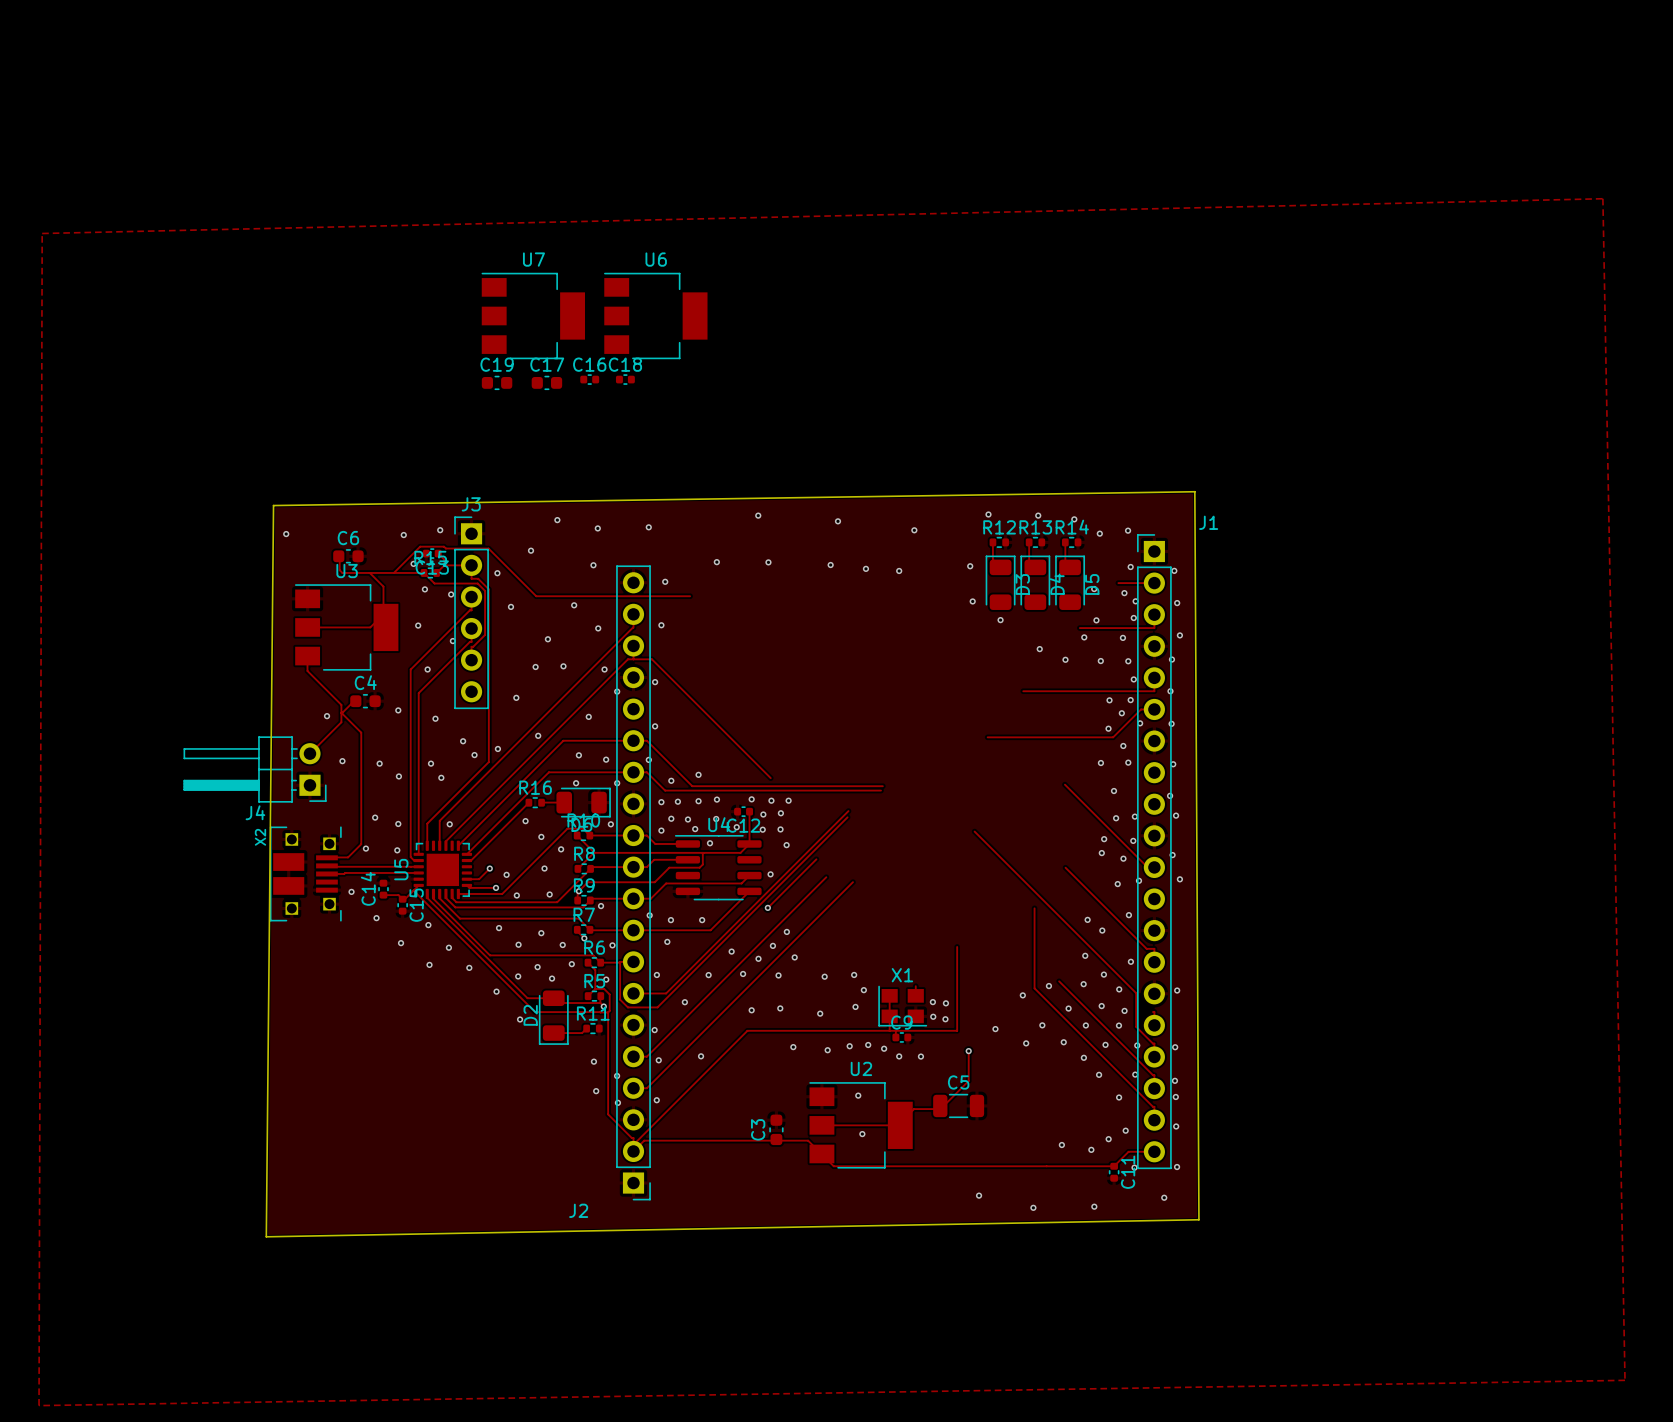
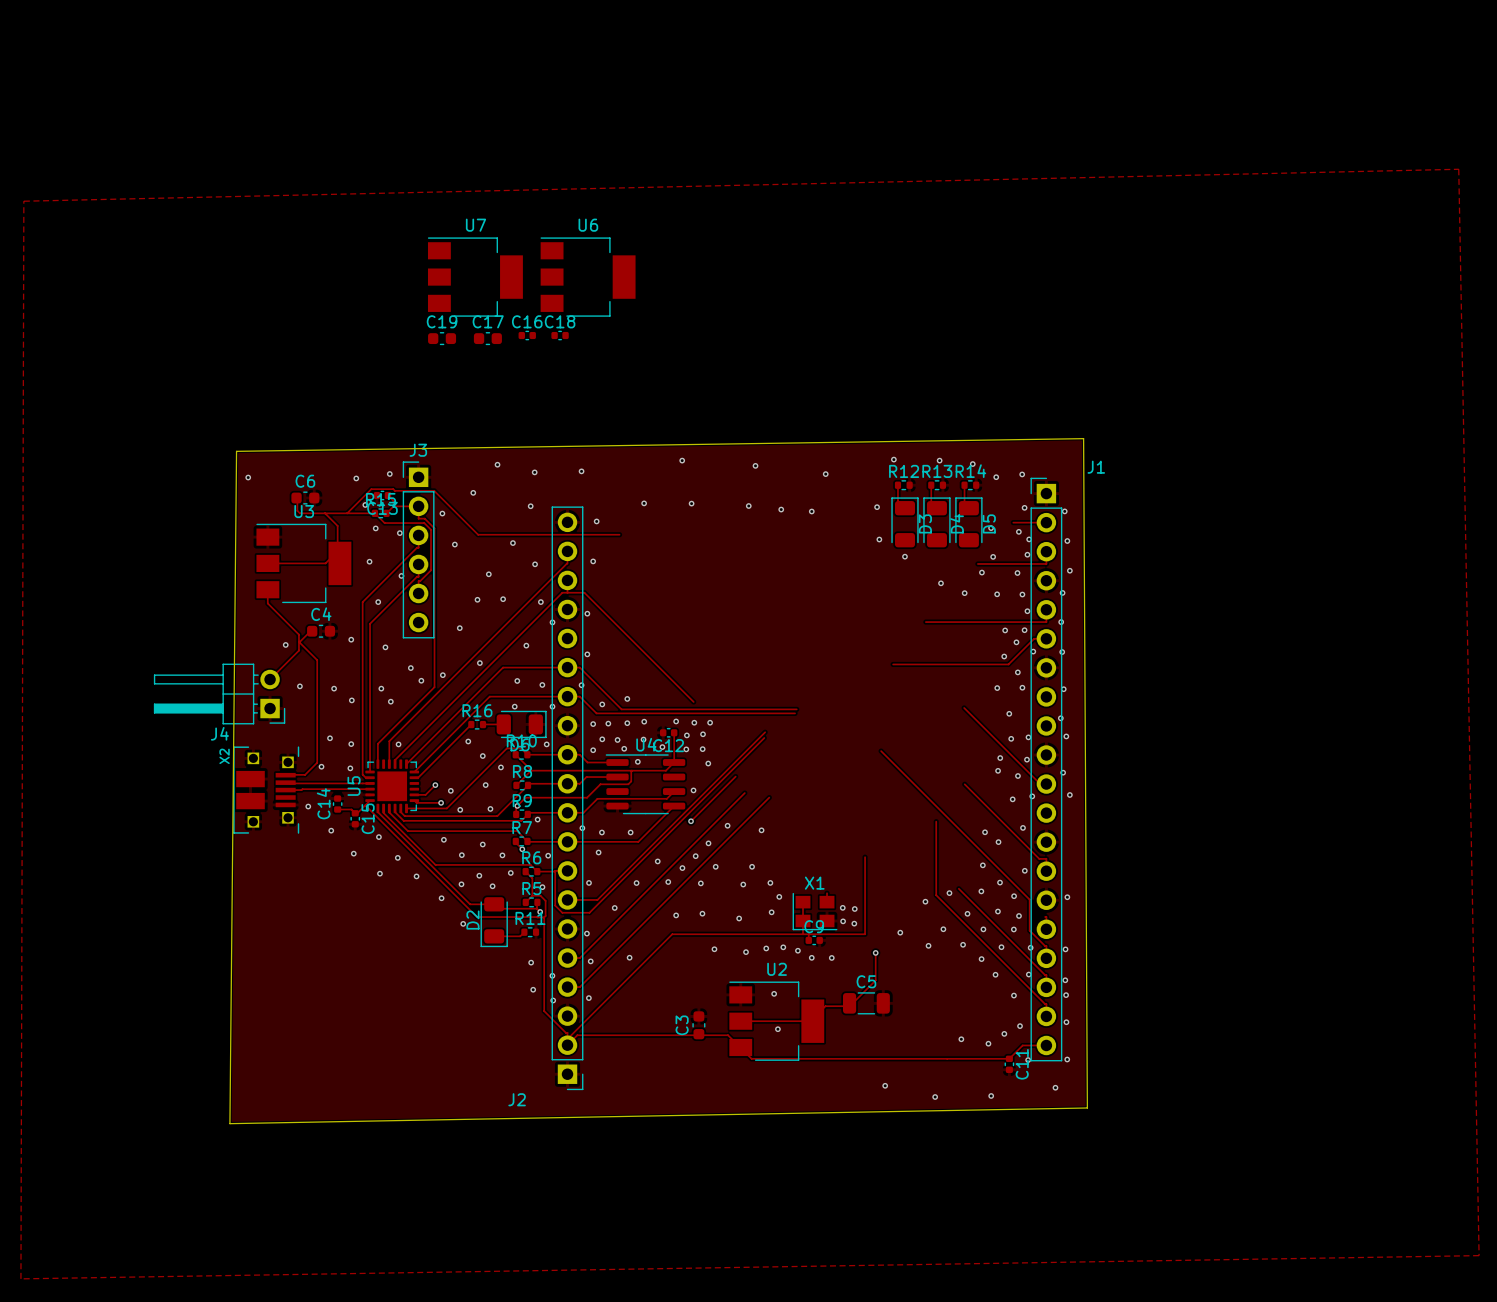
via: none -> (727, 825)
via: none -> (761, 830)
via: none -> (752, 866)

